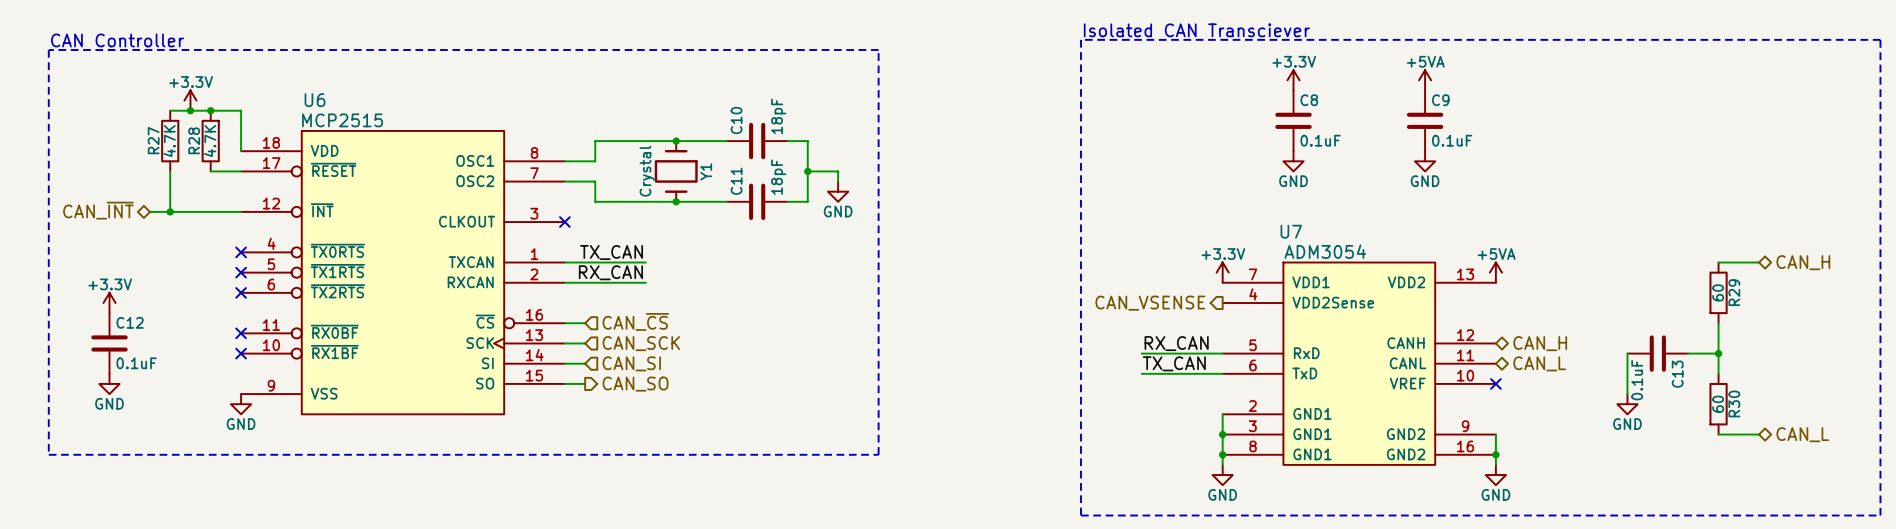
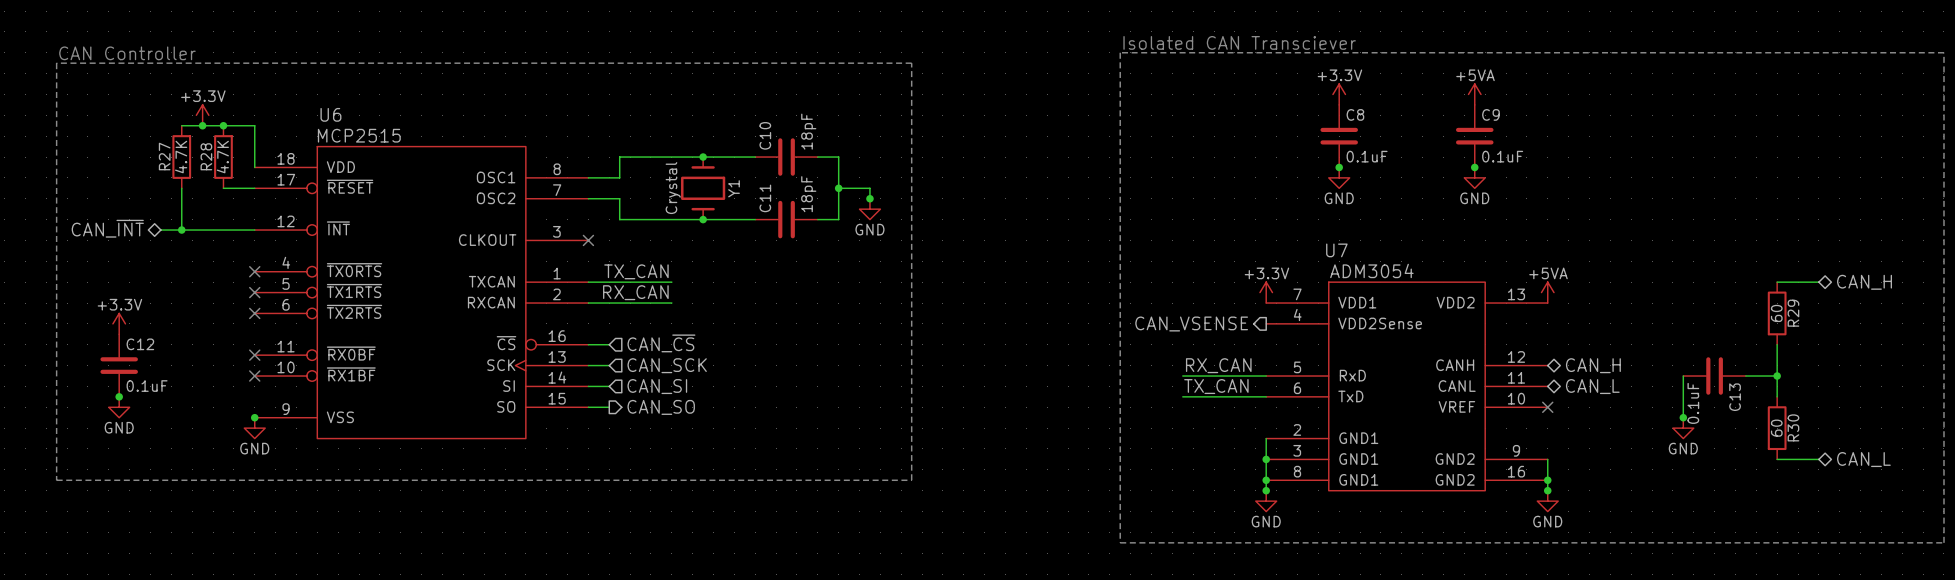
junction: none -> (1339, 167)
junction: none -> (1474, 167)
junction: none -> (869, 198)
junction: none -> (119, 396)
junction: none -> (254, 417)
junction: none -> (1683, 417)
junction: none -> (1266, 490)
junction: none -> (1547, 490)

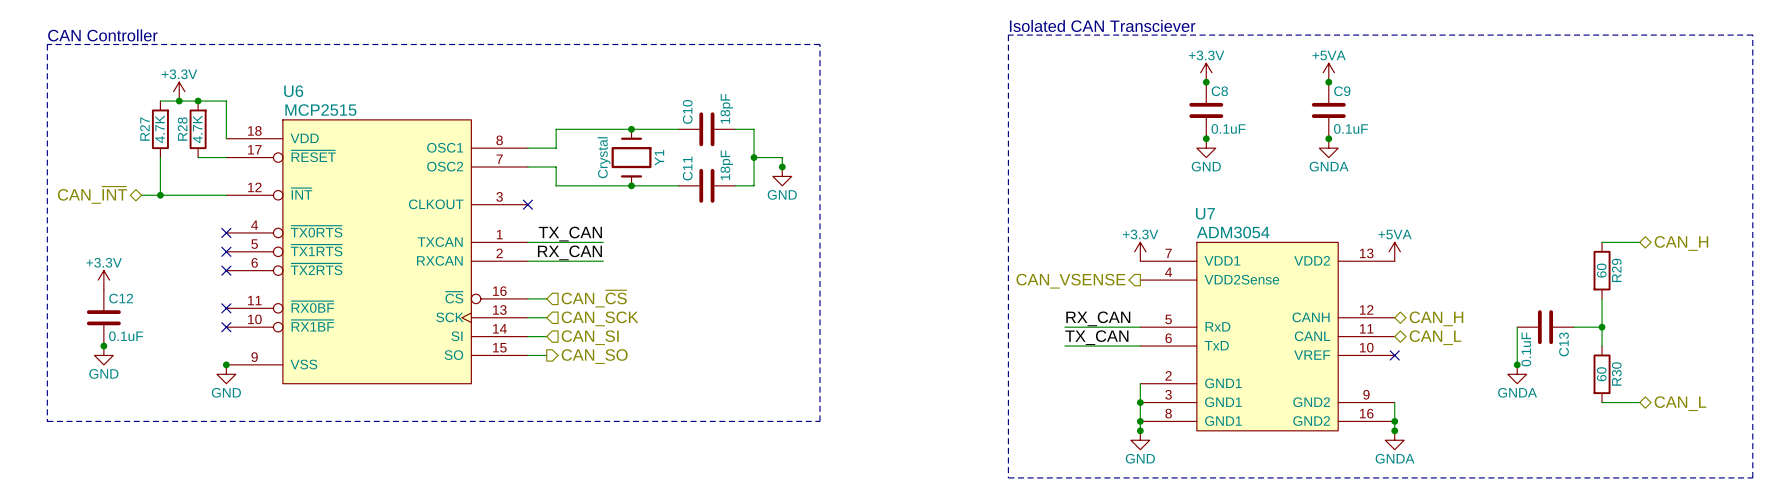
junction: none -> (1206, 82)
junction: none -> (1328, 82)
power symbol: GND (1474, 177) -> GNDA (1328, 148)
power symbol: GND (1683, 428) -> GNDA (1517, 374)
power symbol: GND (1547, 501) -> GNDA (1394, 440)

